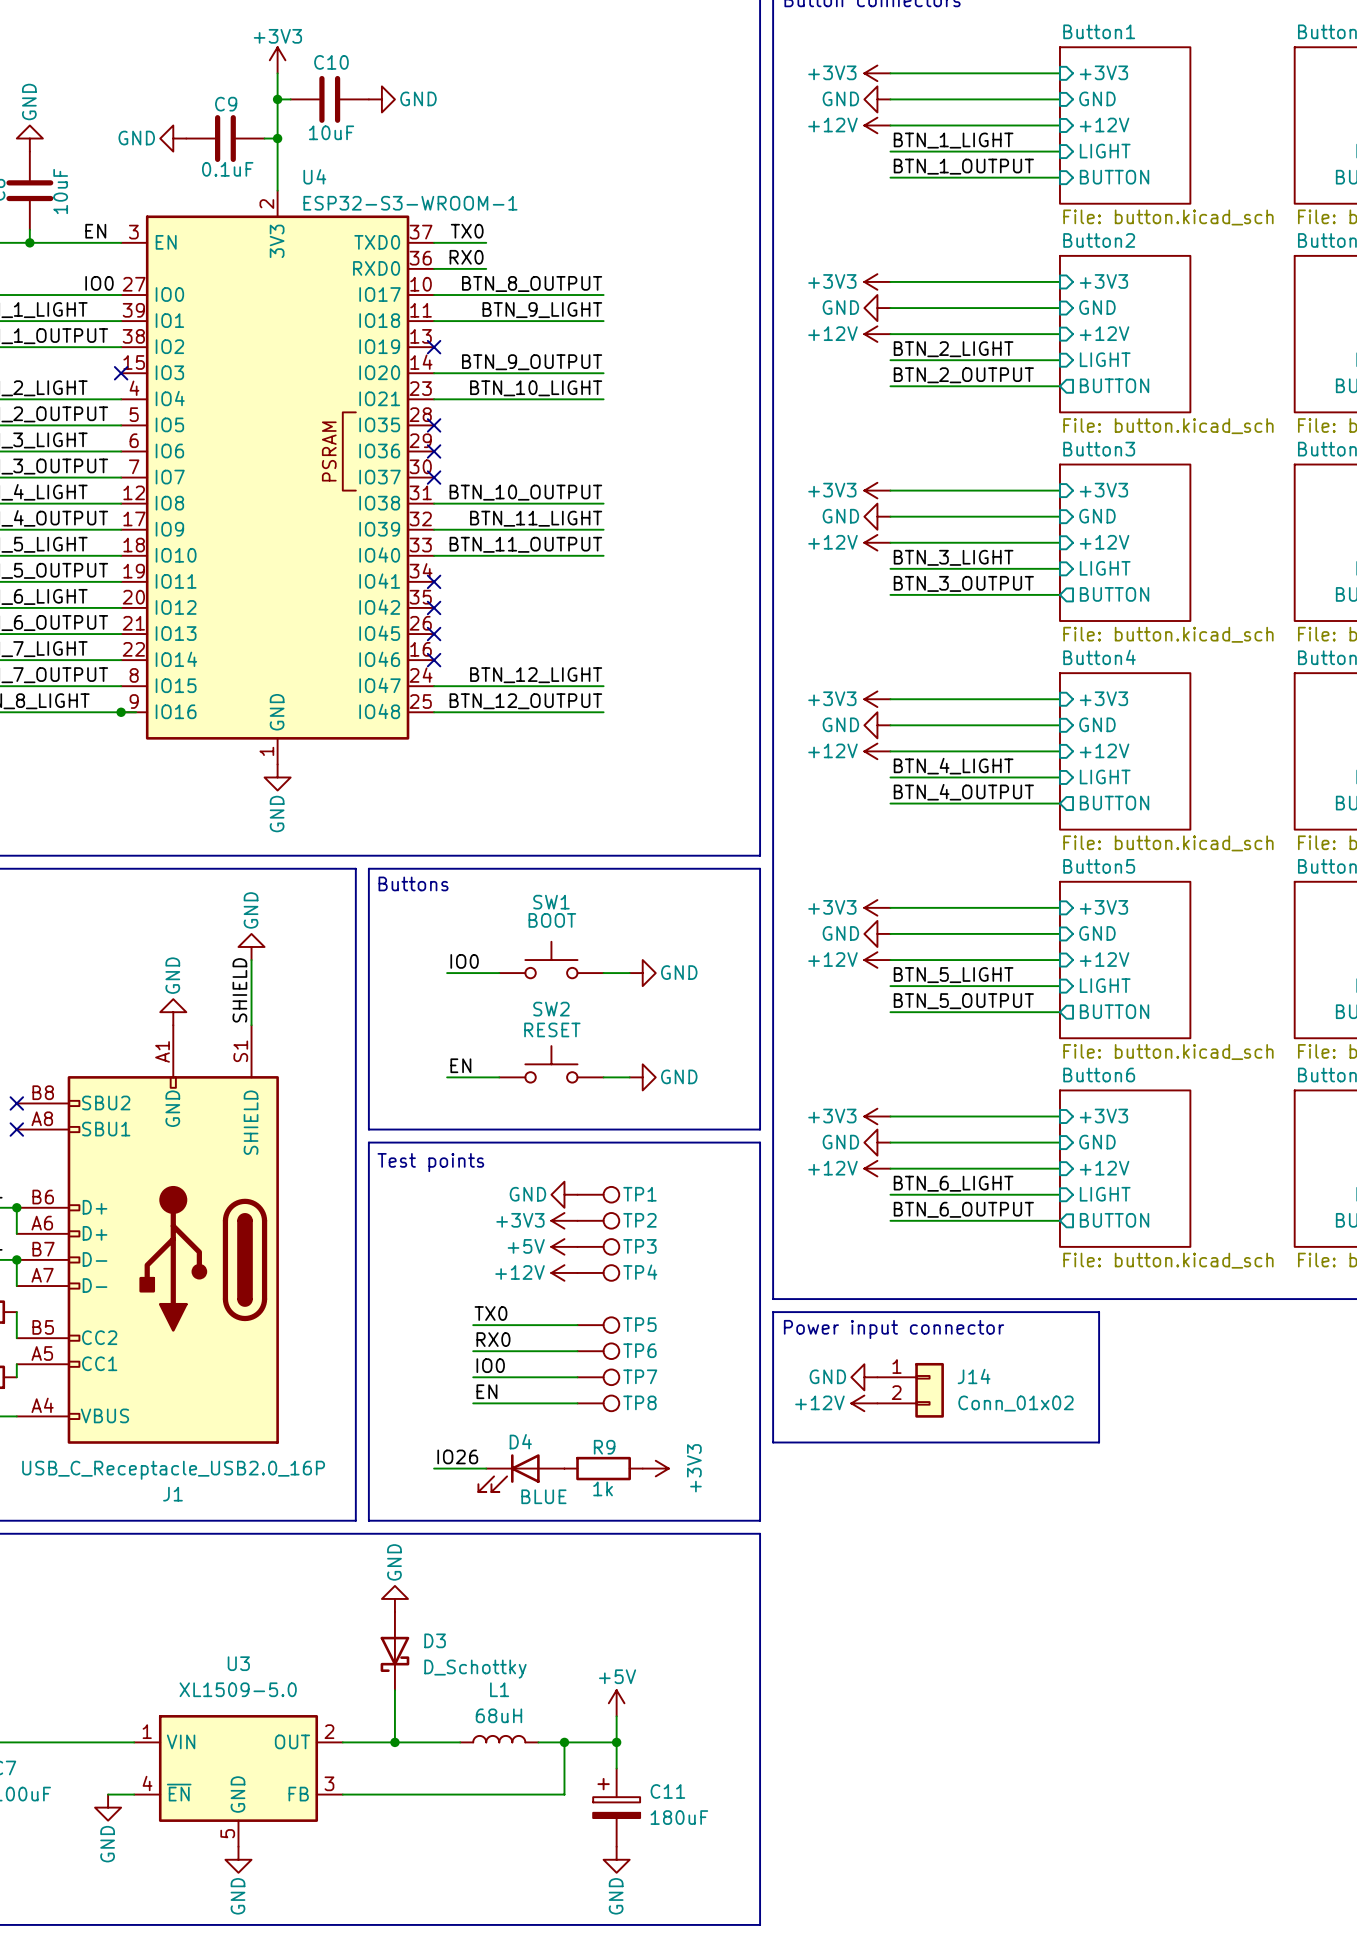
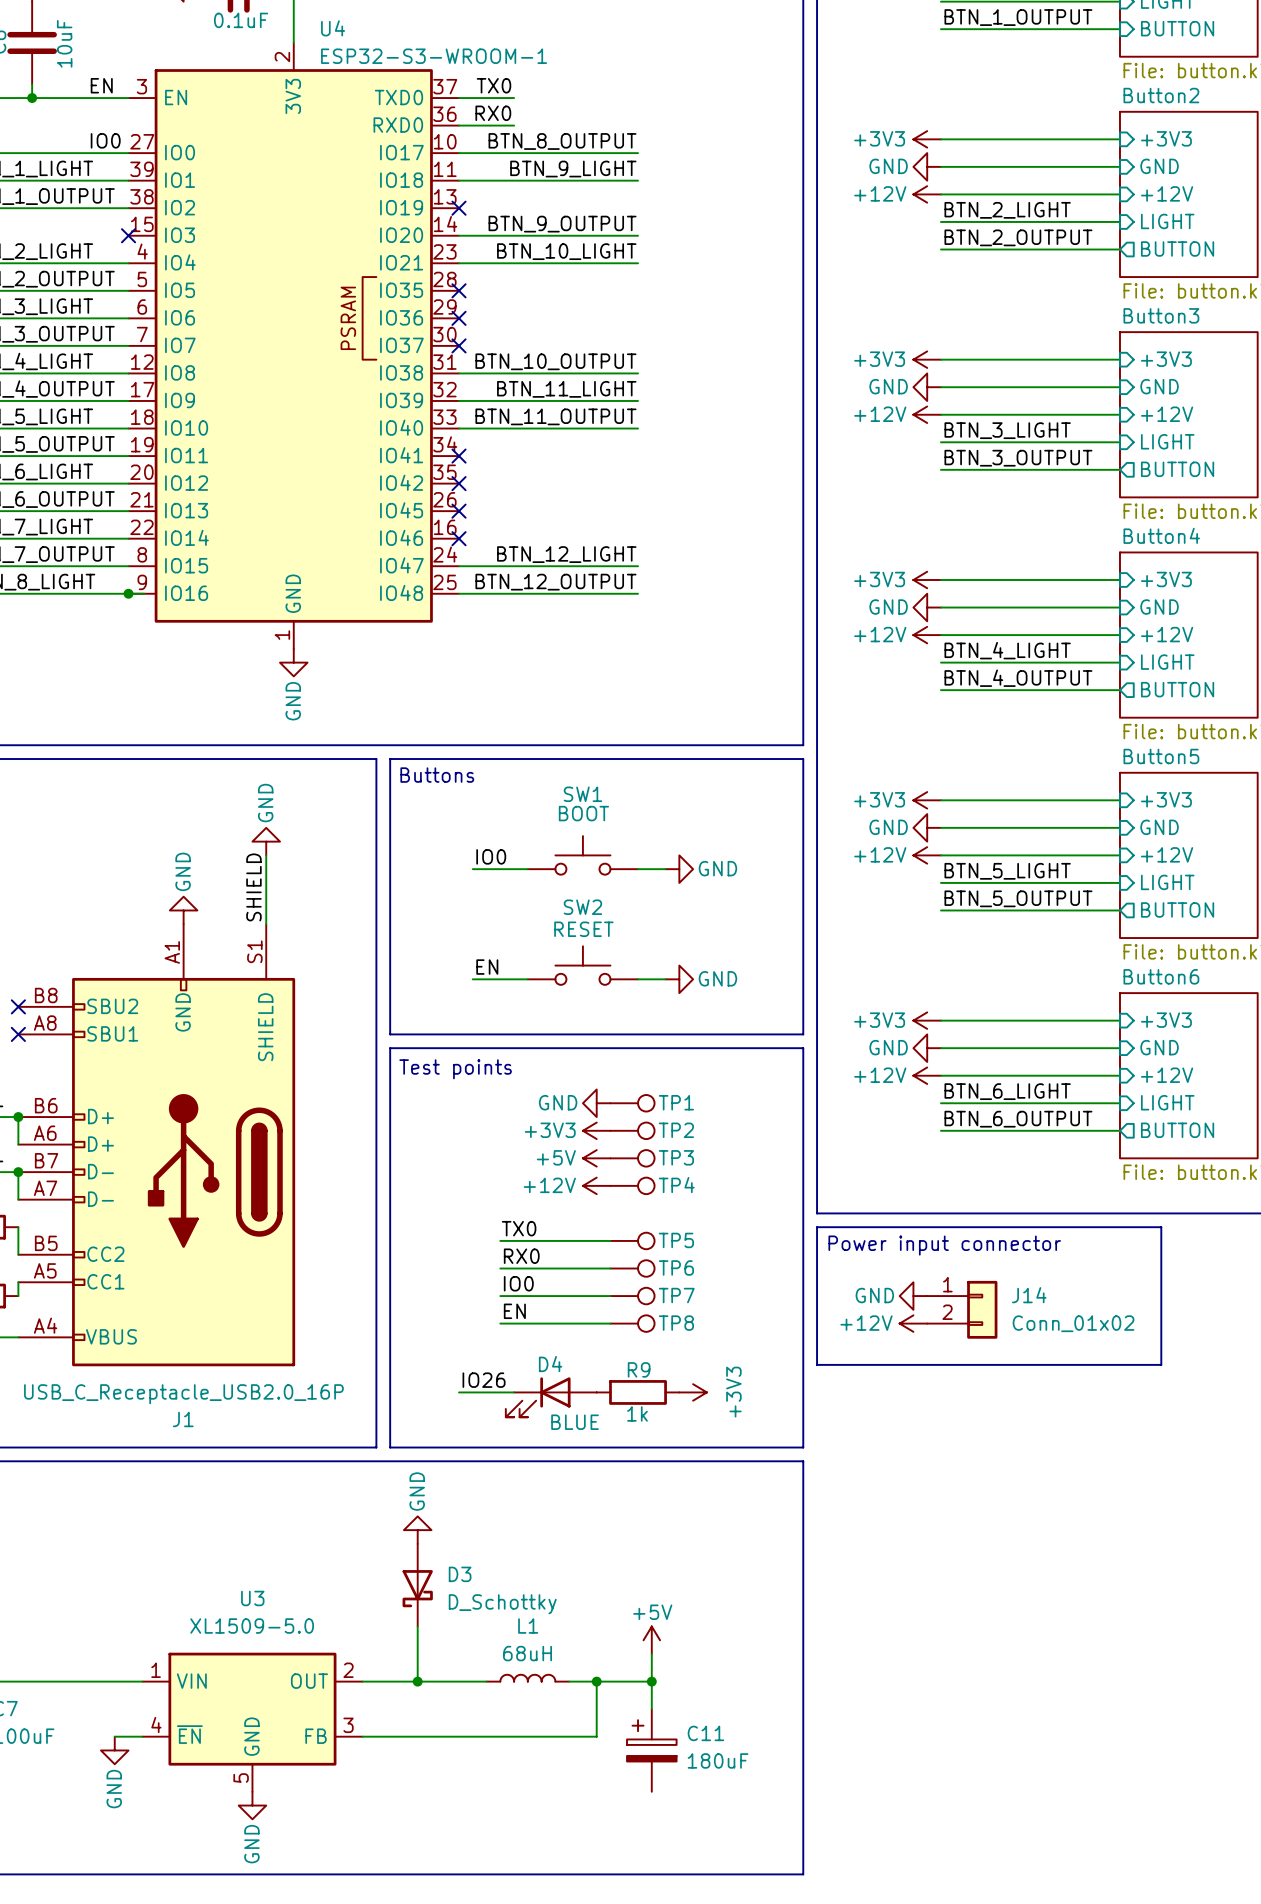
power symbol: GND (616, 1859) -> none

